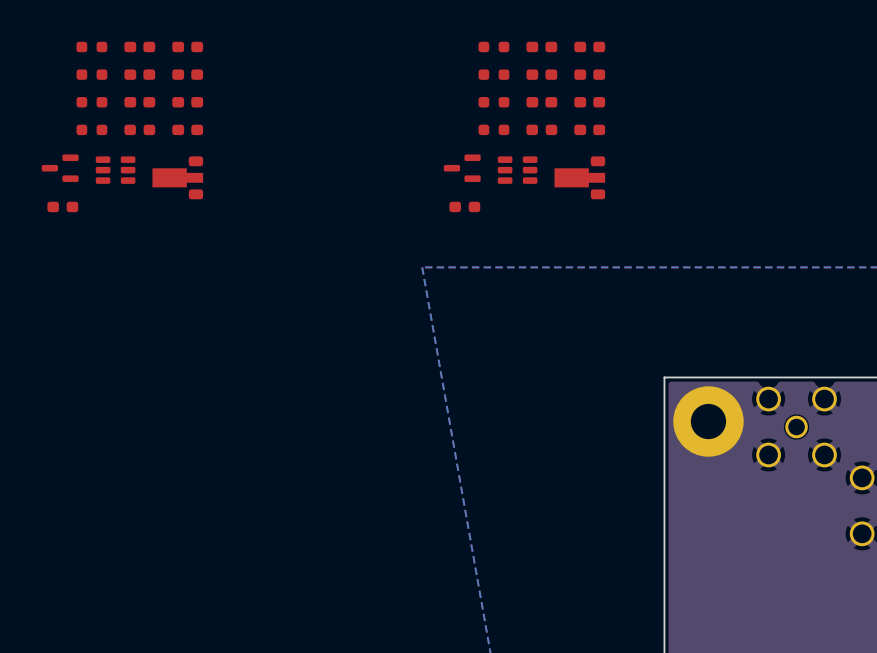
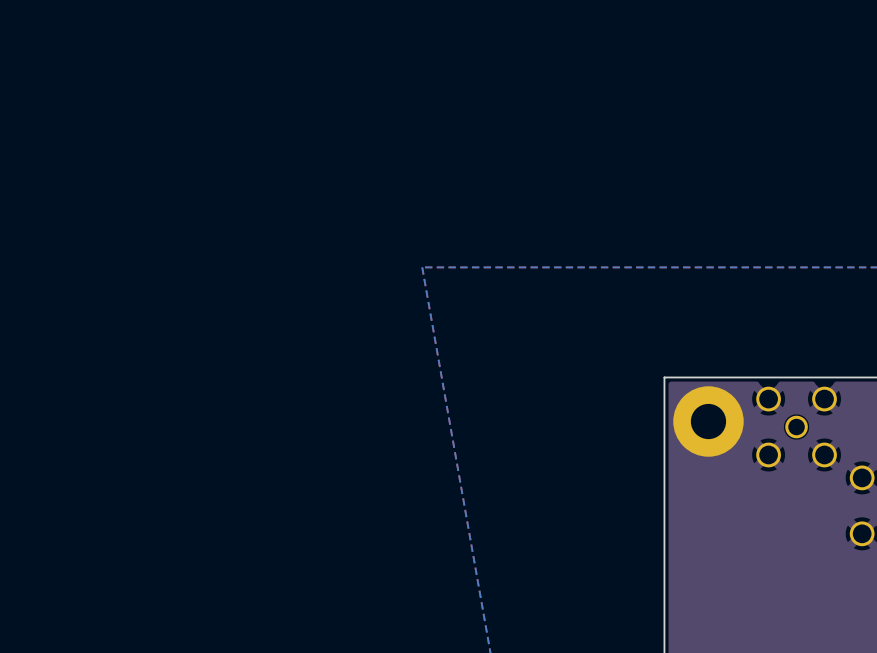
part: (91, 46) -> none
part: (139, 46) -> none
part: (187, 46) -> none
part: (493, 46) -> none
part: (541, 46) -> none
part: (589, 46) -> none
part: (91, 74) -> none
part: (139, 74) -> none
part: (187, 74) -> none
part: (493, 74) -> none
part: (541, 74) -> none
part: (589, 74) -> none
part: (91, 102) -> none
part: (139, 102) -> none
part: (187, 102) -> none
part: (493, 102) -> none
part: (541, 102) -> none
part: (589, 102) -> none
part: (91, 129) -> none
part: (139, 129) -> none
part: (187, 129) -> none
part: (493, 129) -> none
part: (541, 129) -> none
part: (589, 129) -> none
part: (60, 168) -> none
part: (462, 168) -> none
part: (115, 170) -> none
part: (517, 170) -> none
part: (177, 177) -> none
part: (579, 177) -> none
part: (62, 206) -> none
part: (464, 206) -> none

